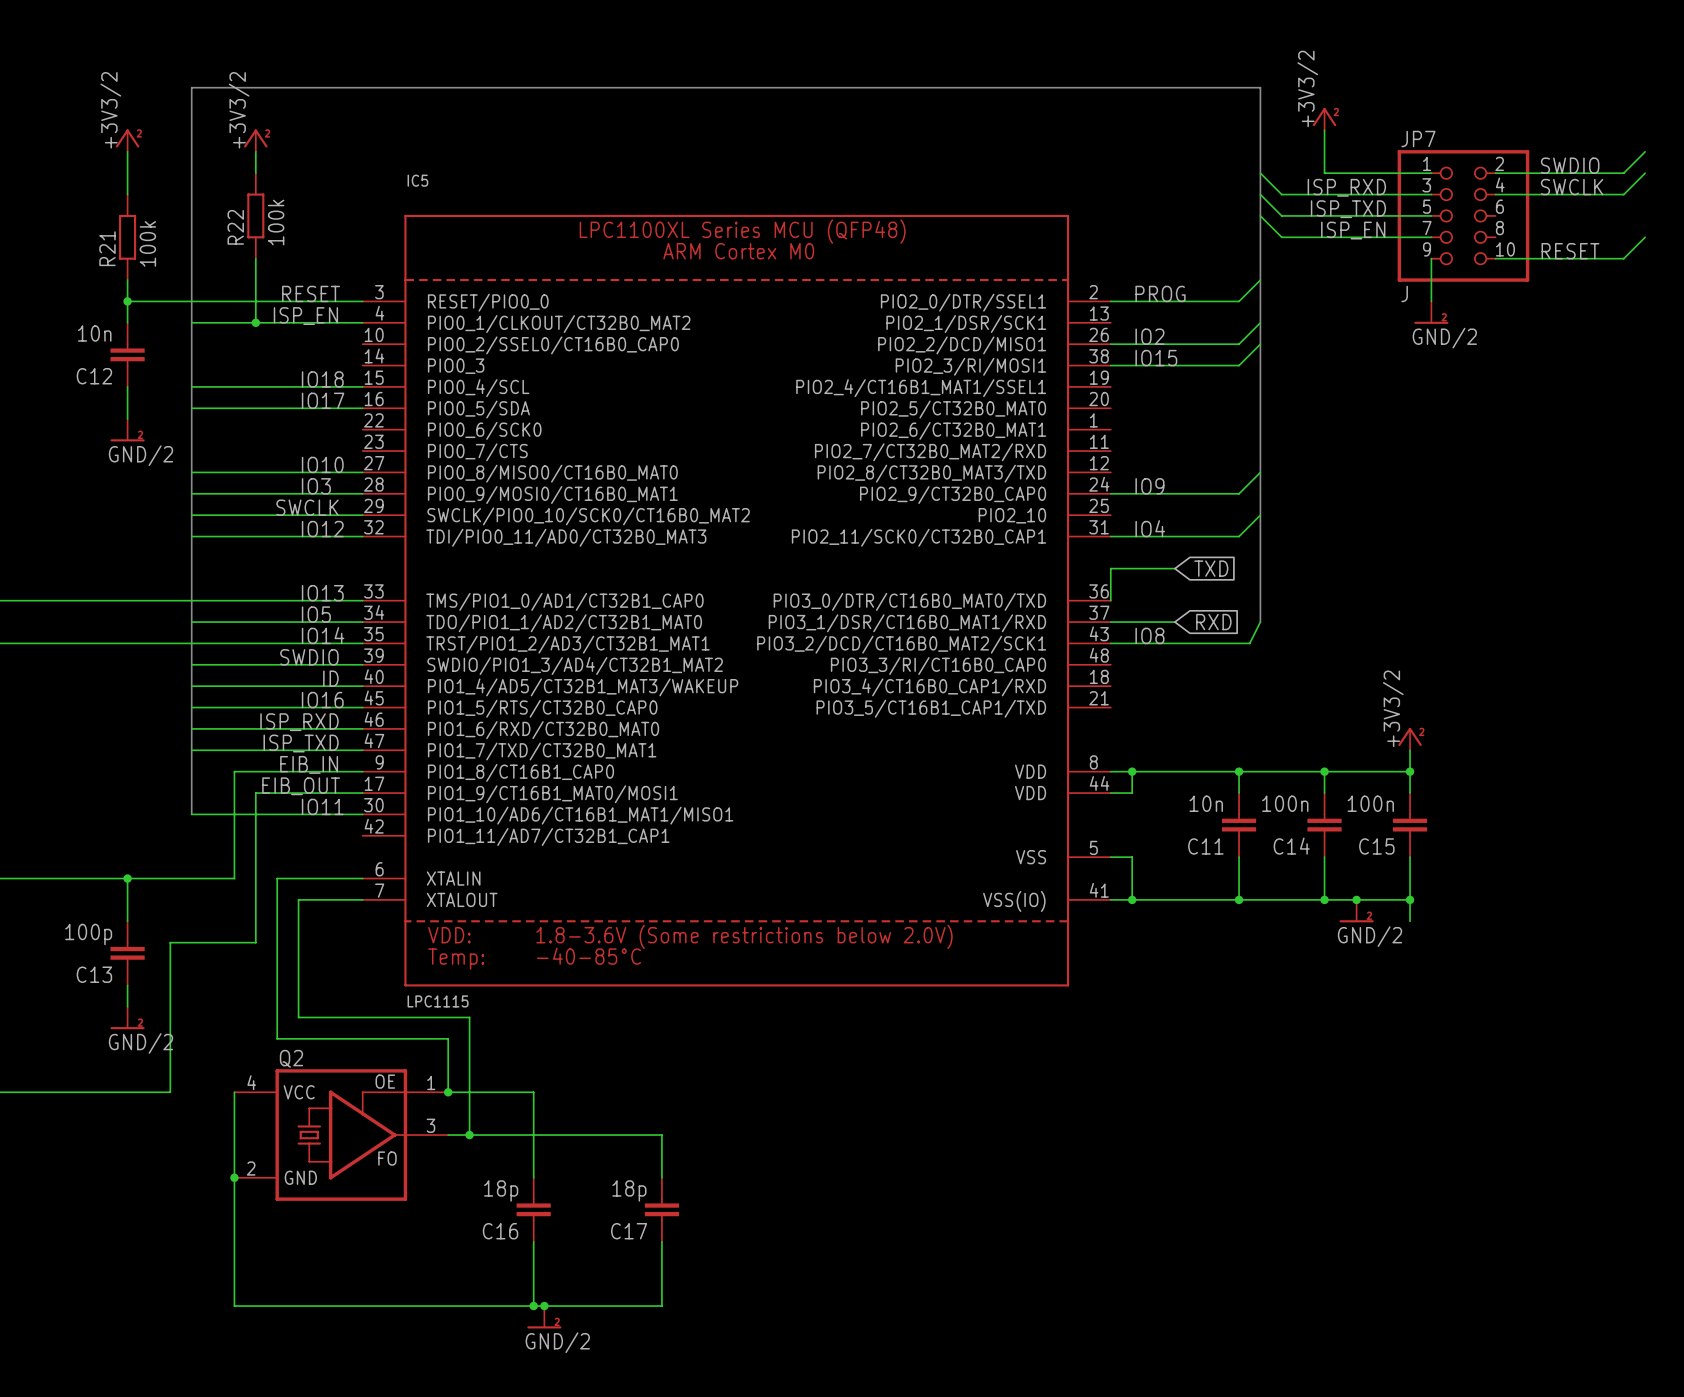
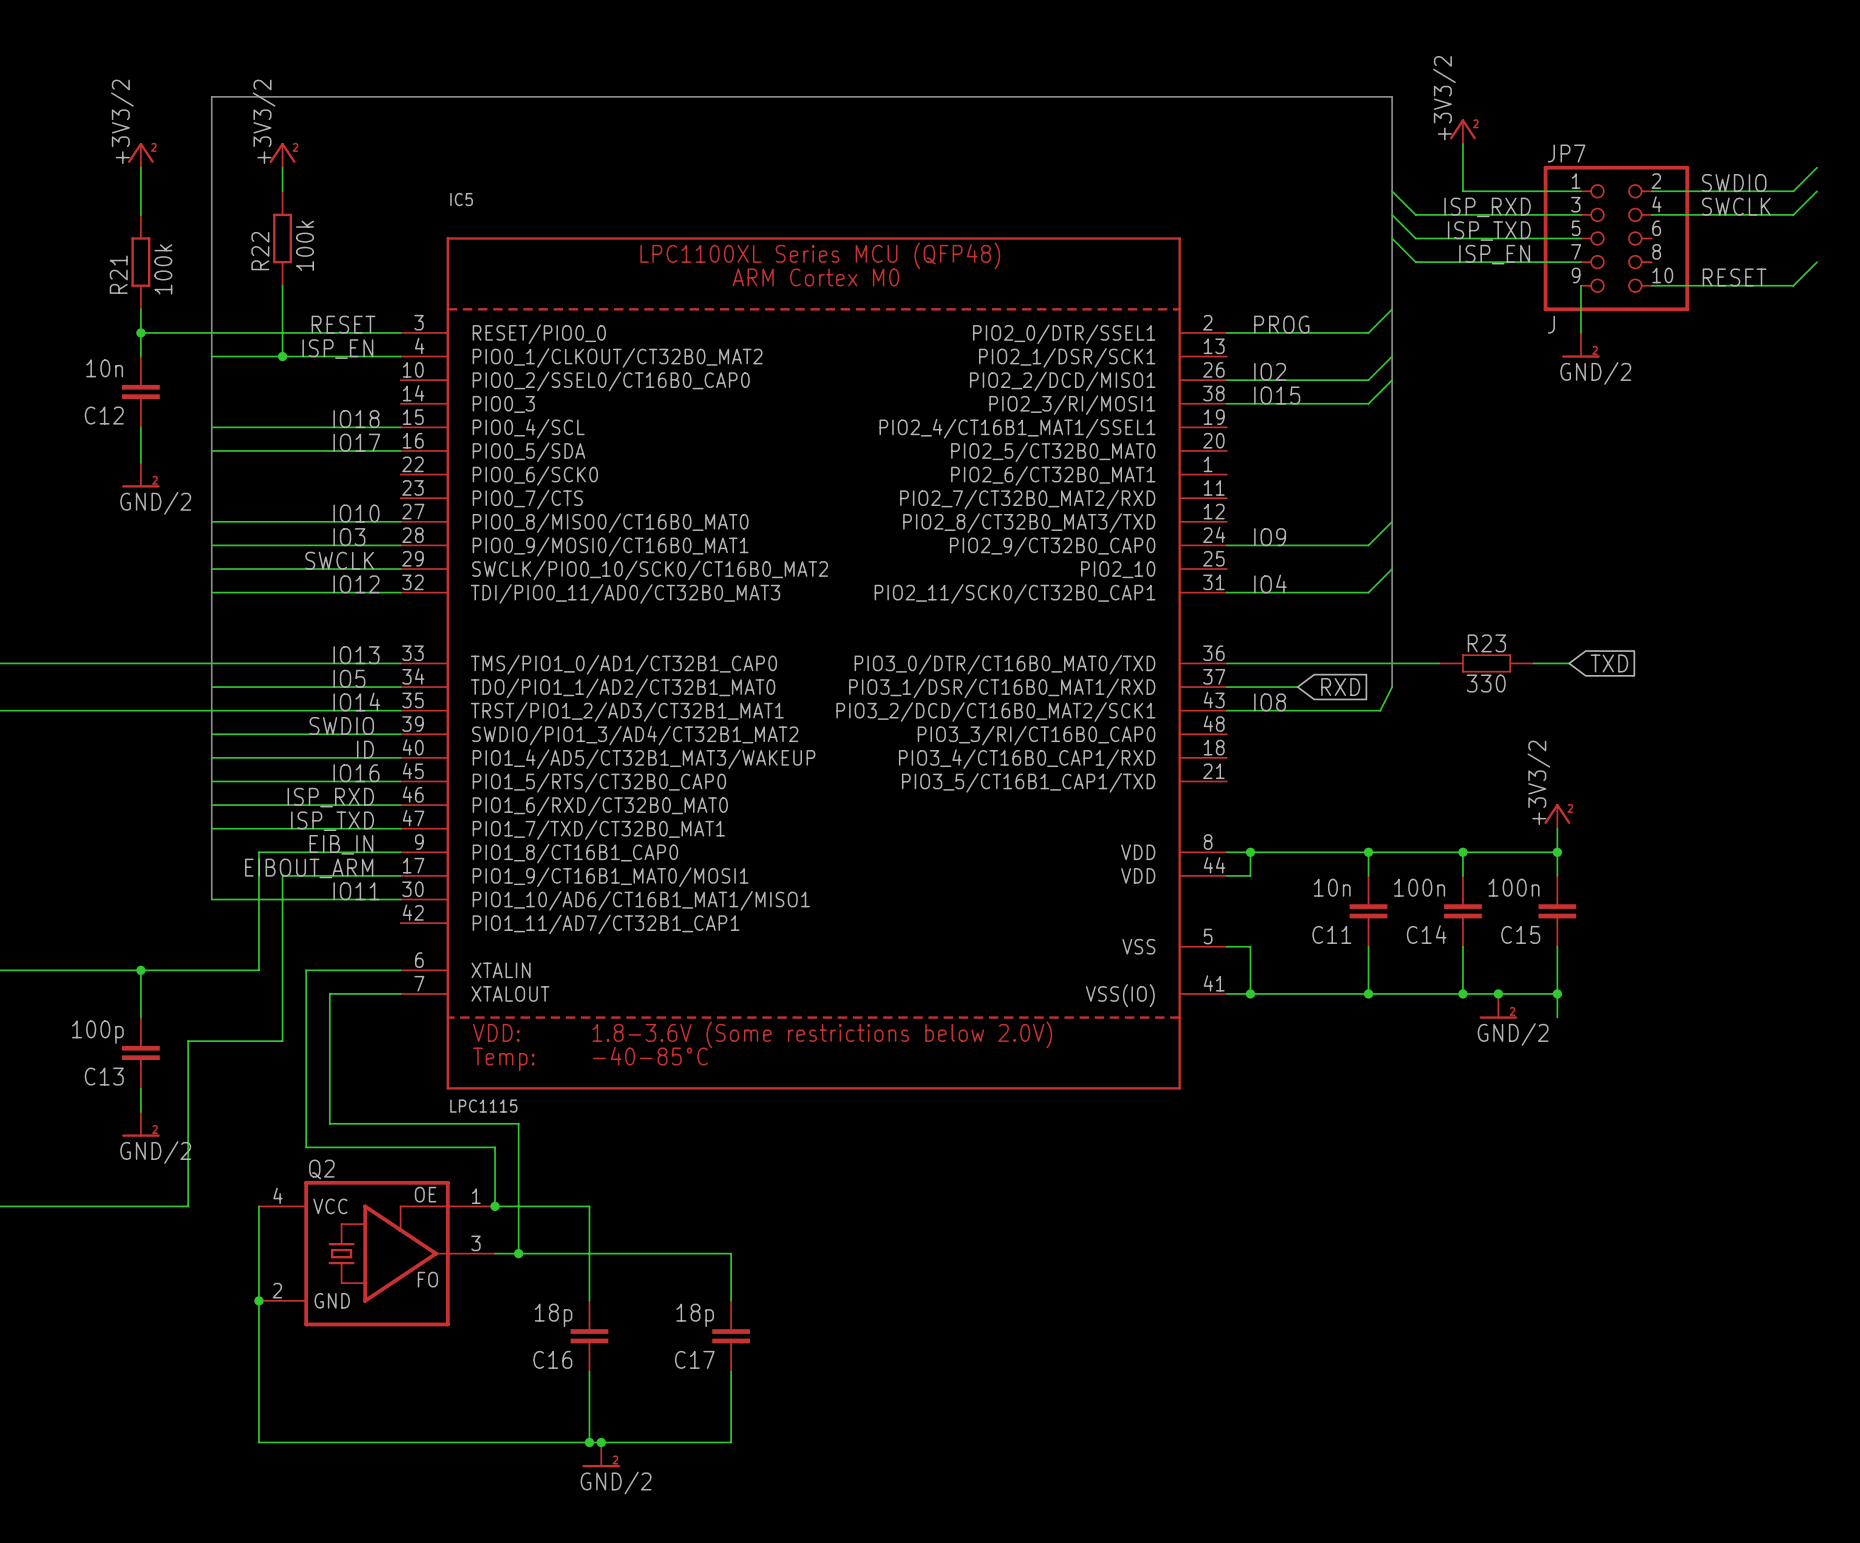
wire: (1174, 568) (1110, 568) (1110, 600) -> (1439, 663) (1226, 663)
global label: TXD (1211, 568) -> none
R23: none -> 330 (1486, 663)
wire: none -> (1533, 663) (1569, 663)
global label: none -> TXD (1609, 663)
label: EIB_OUT (301, 786) -> EIBOUT_ARM (309, 868)

